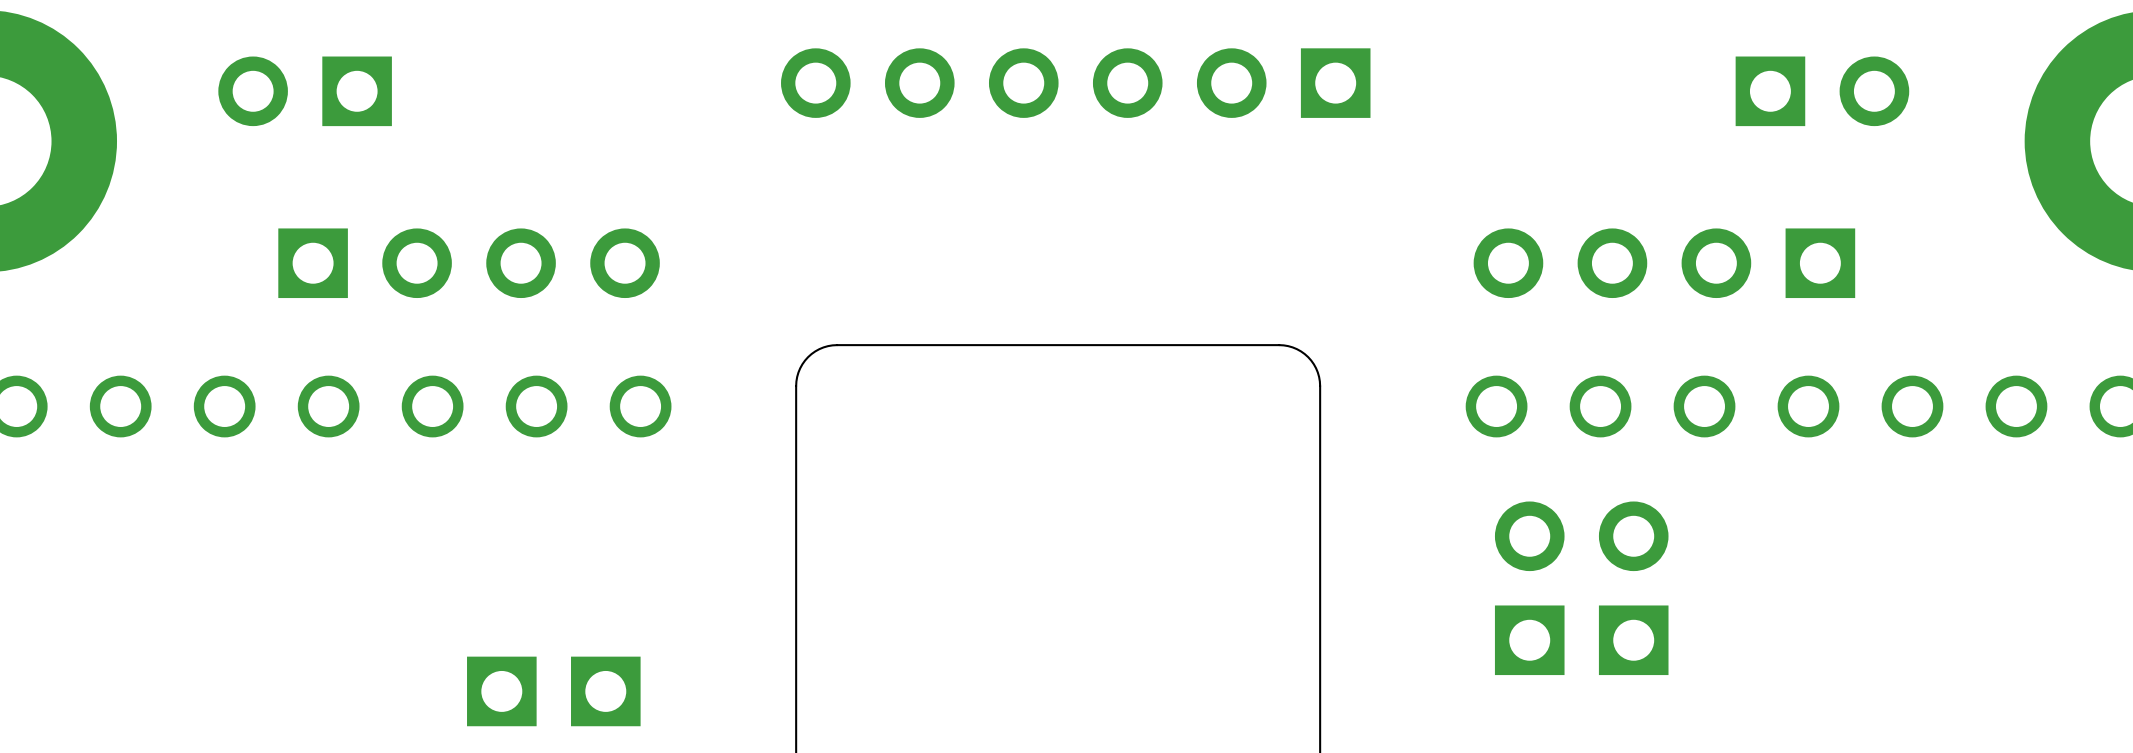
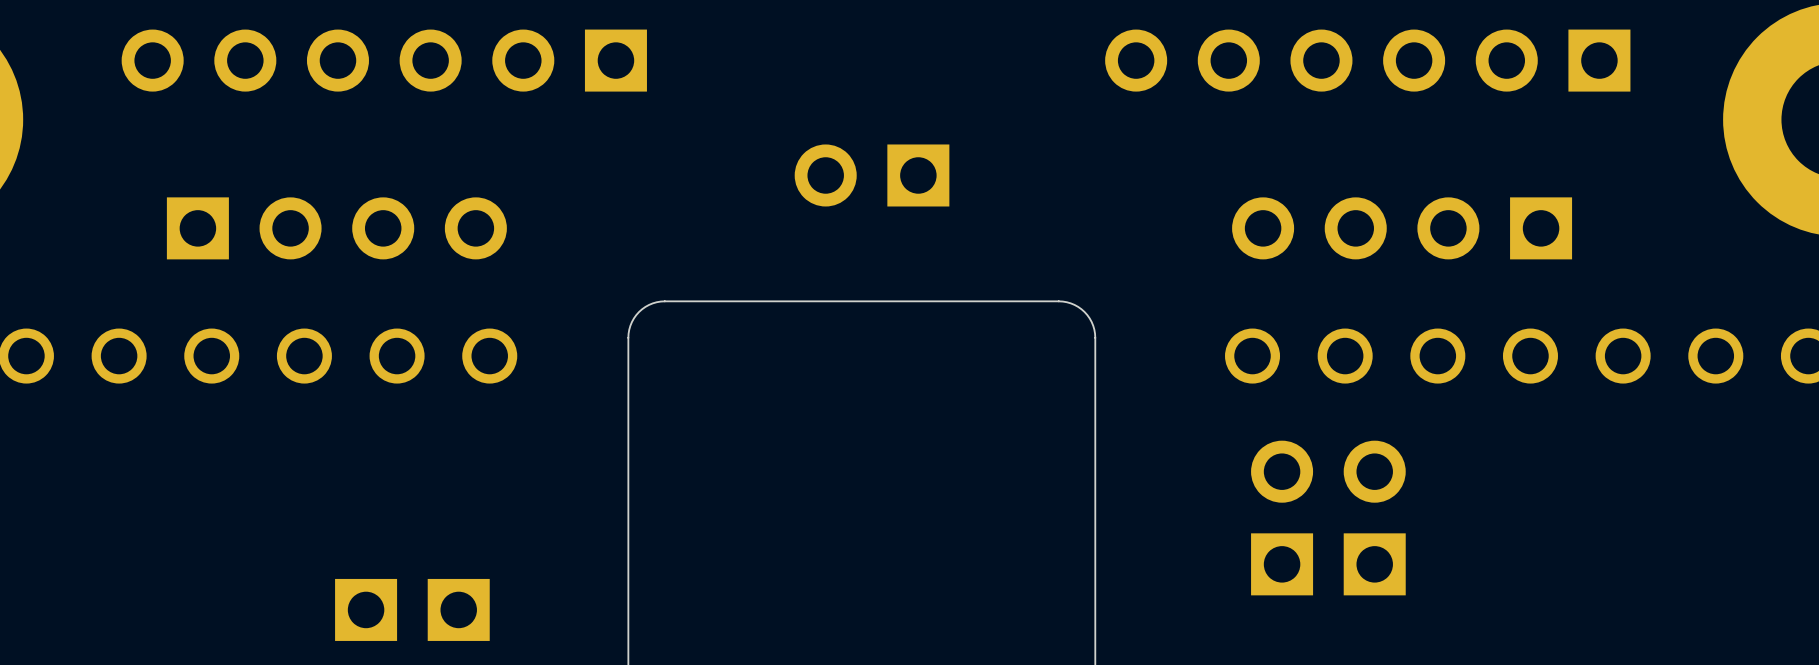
part: none -> (384, 60)
part: none -> (1367, 60)
part: (1075, 83) -> none
part: (305, 91) -> none
part: (1822, 91) -> none
part: none -> (872, 175)

